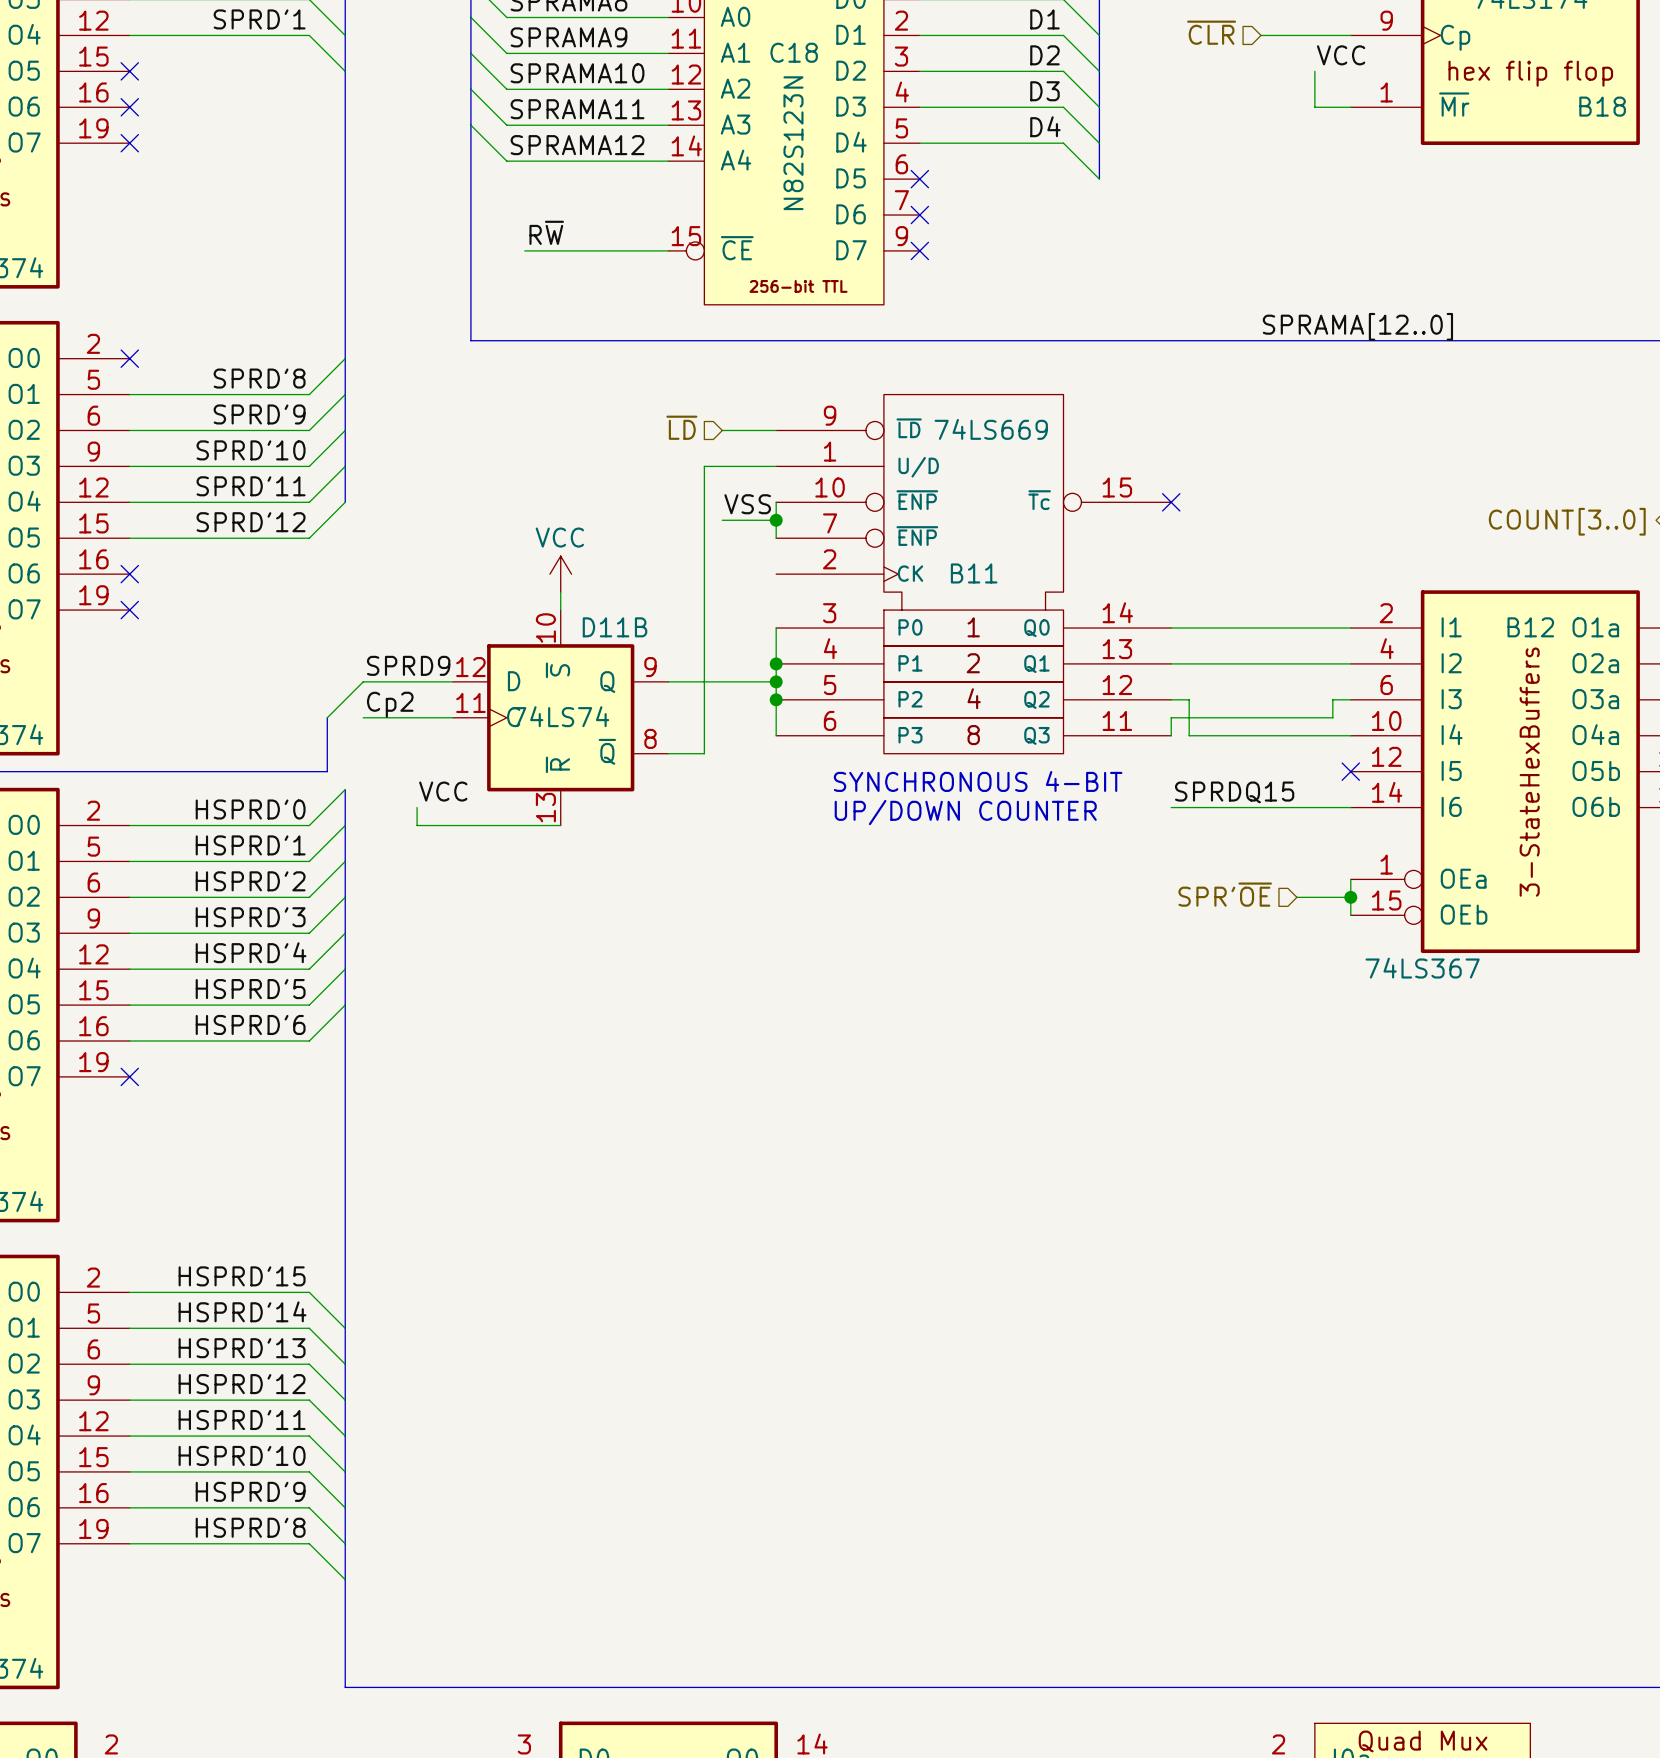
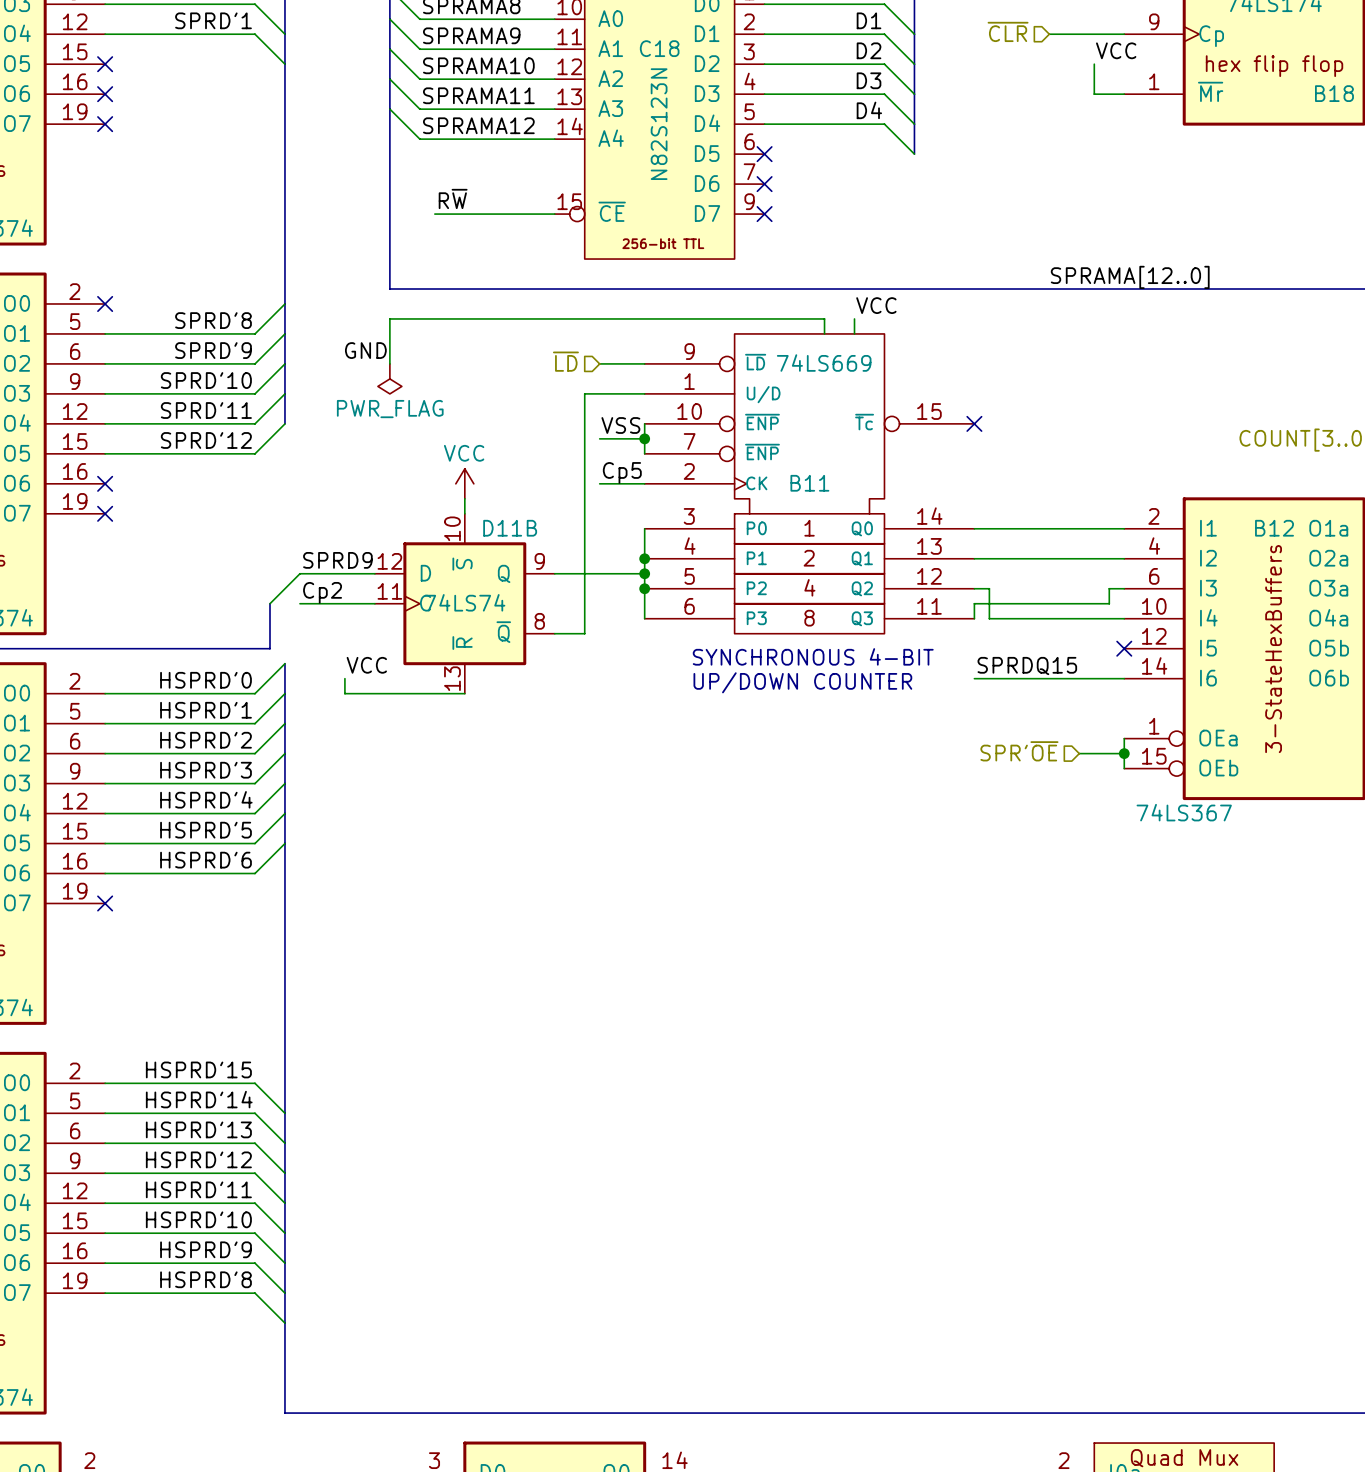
label: none -> VCC (876, 305)
wire: none -> (854, 318) (854, 333)
wire: none -> (824, 333) (824, 318) (389, 318) (389, 363)
label: none -> GND (365, 350)
power symbol: none -> PWR_FLAG (389, 378)
label: none -> Cp5 (622, 472)
wire: none -> (599, 483) (644, 483)

